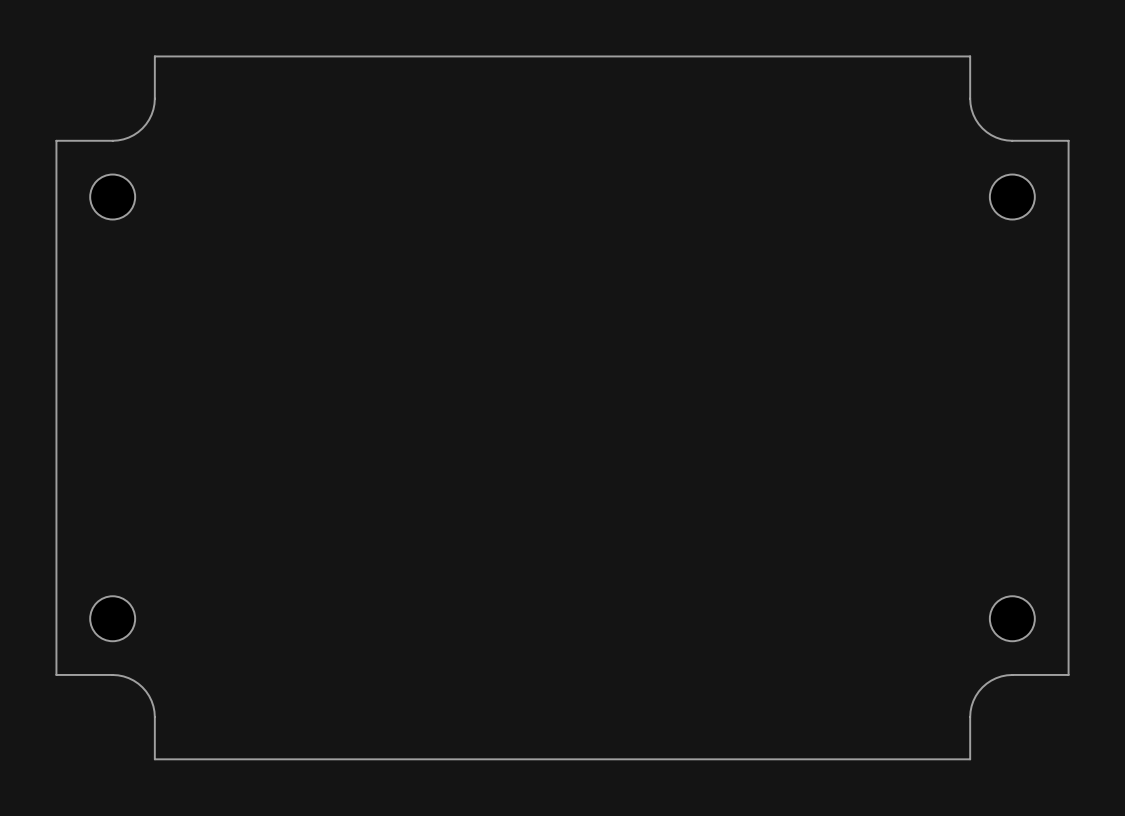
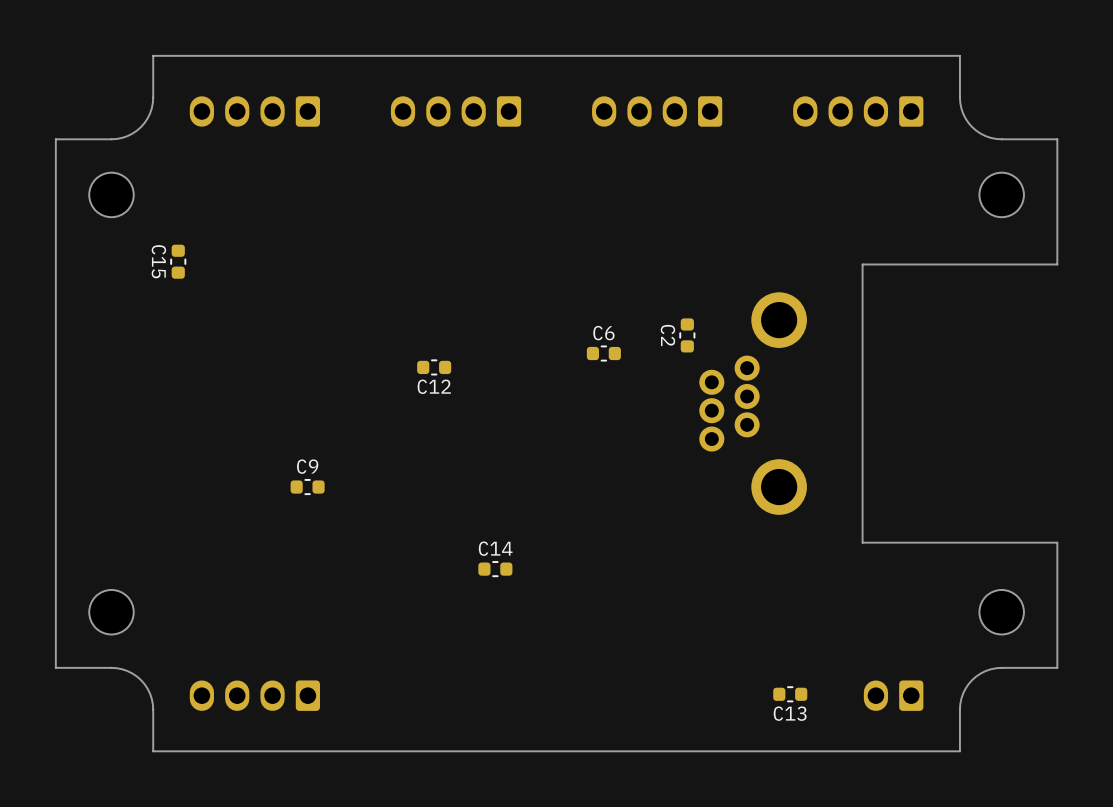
part: none -> (254, 111)
part: none -> (456, 111)
part: none -> (657, 111)
part: none -> (858, 111)
C15: none -> (178, 261)
board edge: (1068, 267) (1068, 548) -> (1057, 264) (862, 264) (862, 542) (1057, 542)
C2: none -> (687, 335)
C6: none -> (603, 353)
C12: none -> (434, 367)
part: none -> (753, 403)
C9: none -> (307, 487)
C14: none -> (495, 569)
C13: none -> (790, 694)
part: none -> (254, 695)
part: none -> (893, 695)

